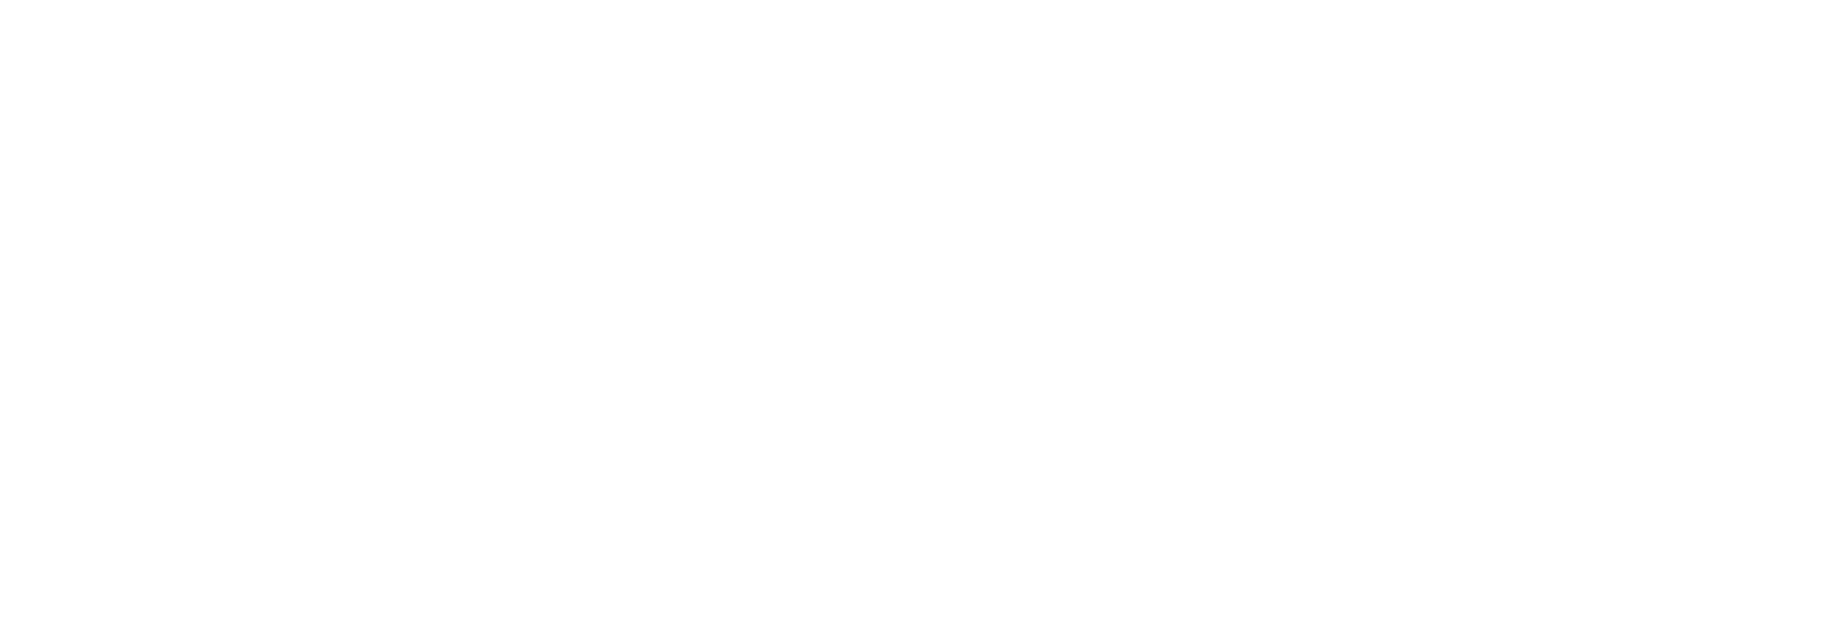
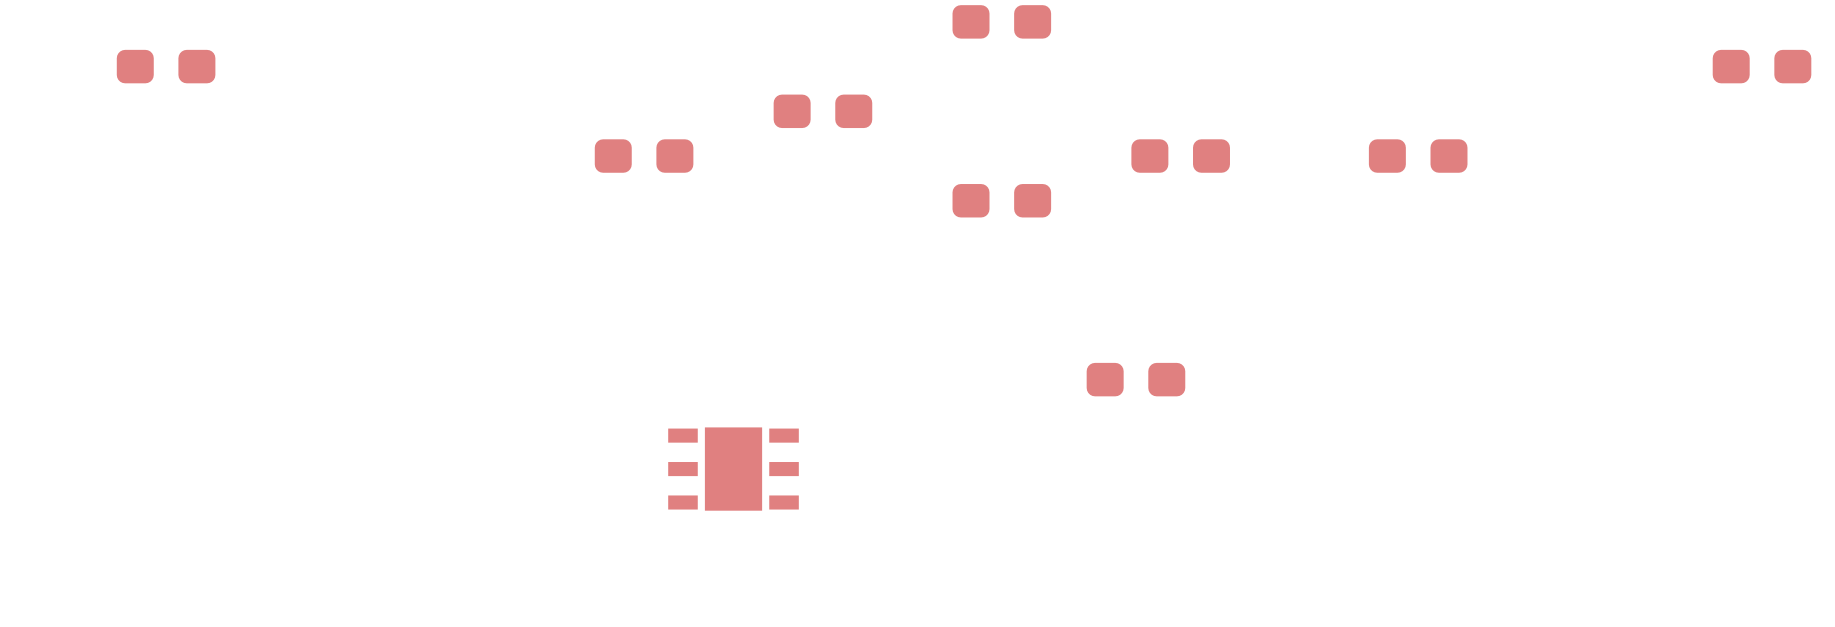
part: none -> (1001, 21)
part: none -> (166, 66)
part: none -> (1762, 66)
part: none -> (822, 111)
part: none -> (644, 156)
part: none -> (1180, 156)
part: none -> (1418, 156)
part: none -> (1001, 200)
part: none -> (1135, 379)
part: none -> (733, 469)

